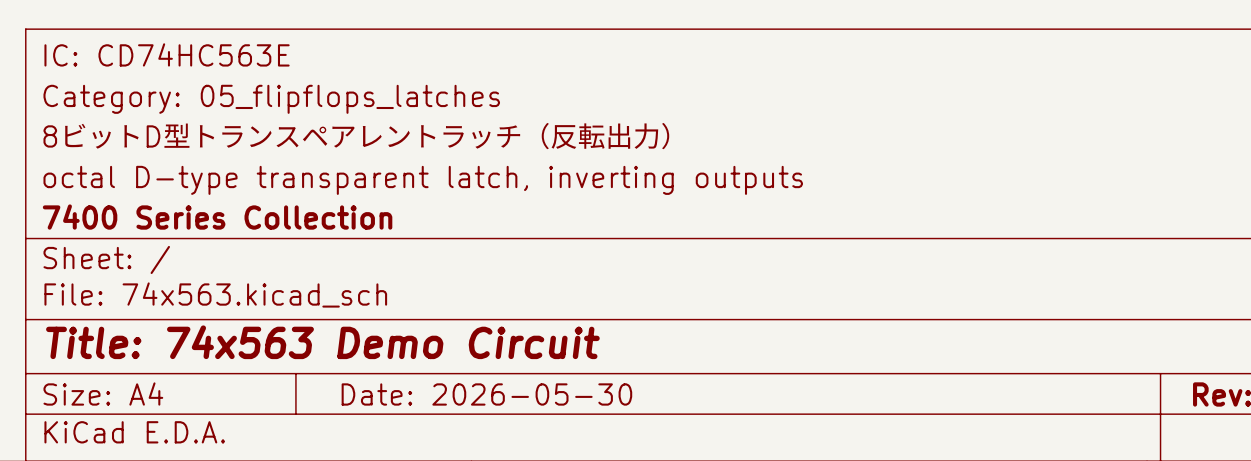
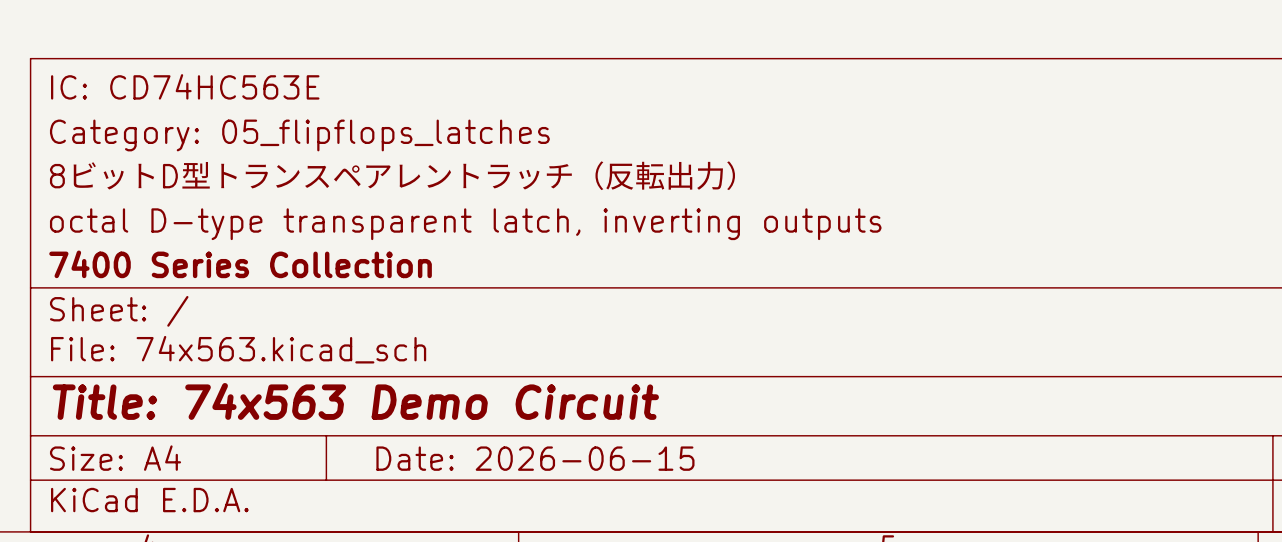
title block: Date: 2026-05-30 (486, 394) -> Date: 2026-06-15 (535, 458)

